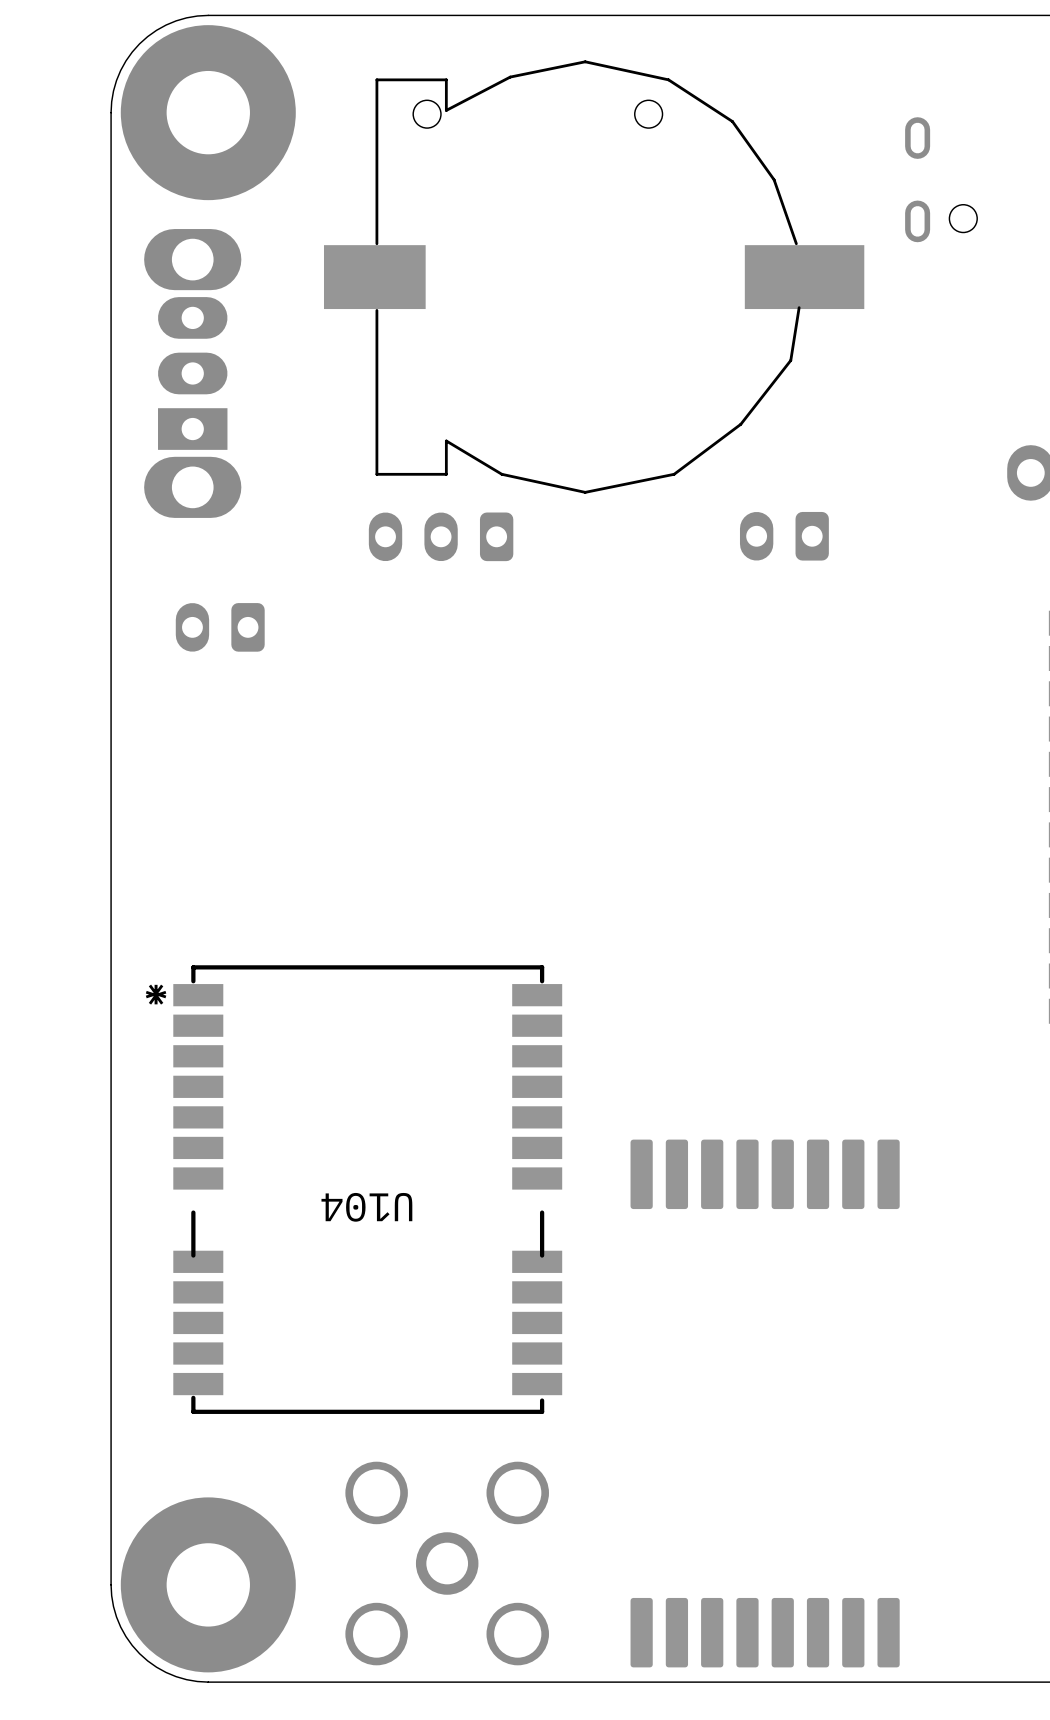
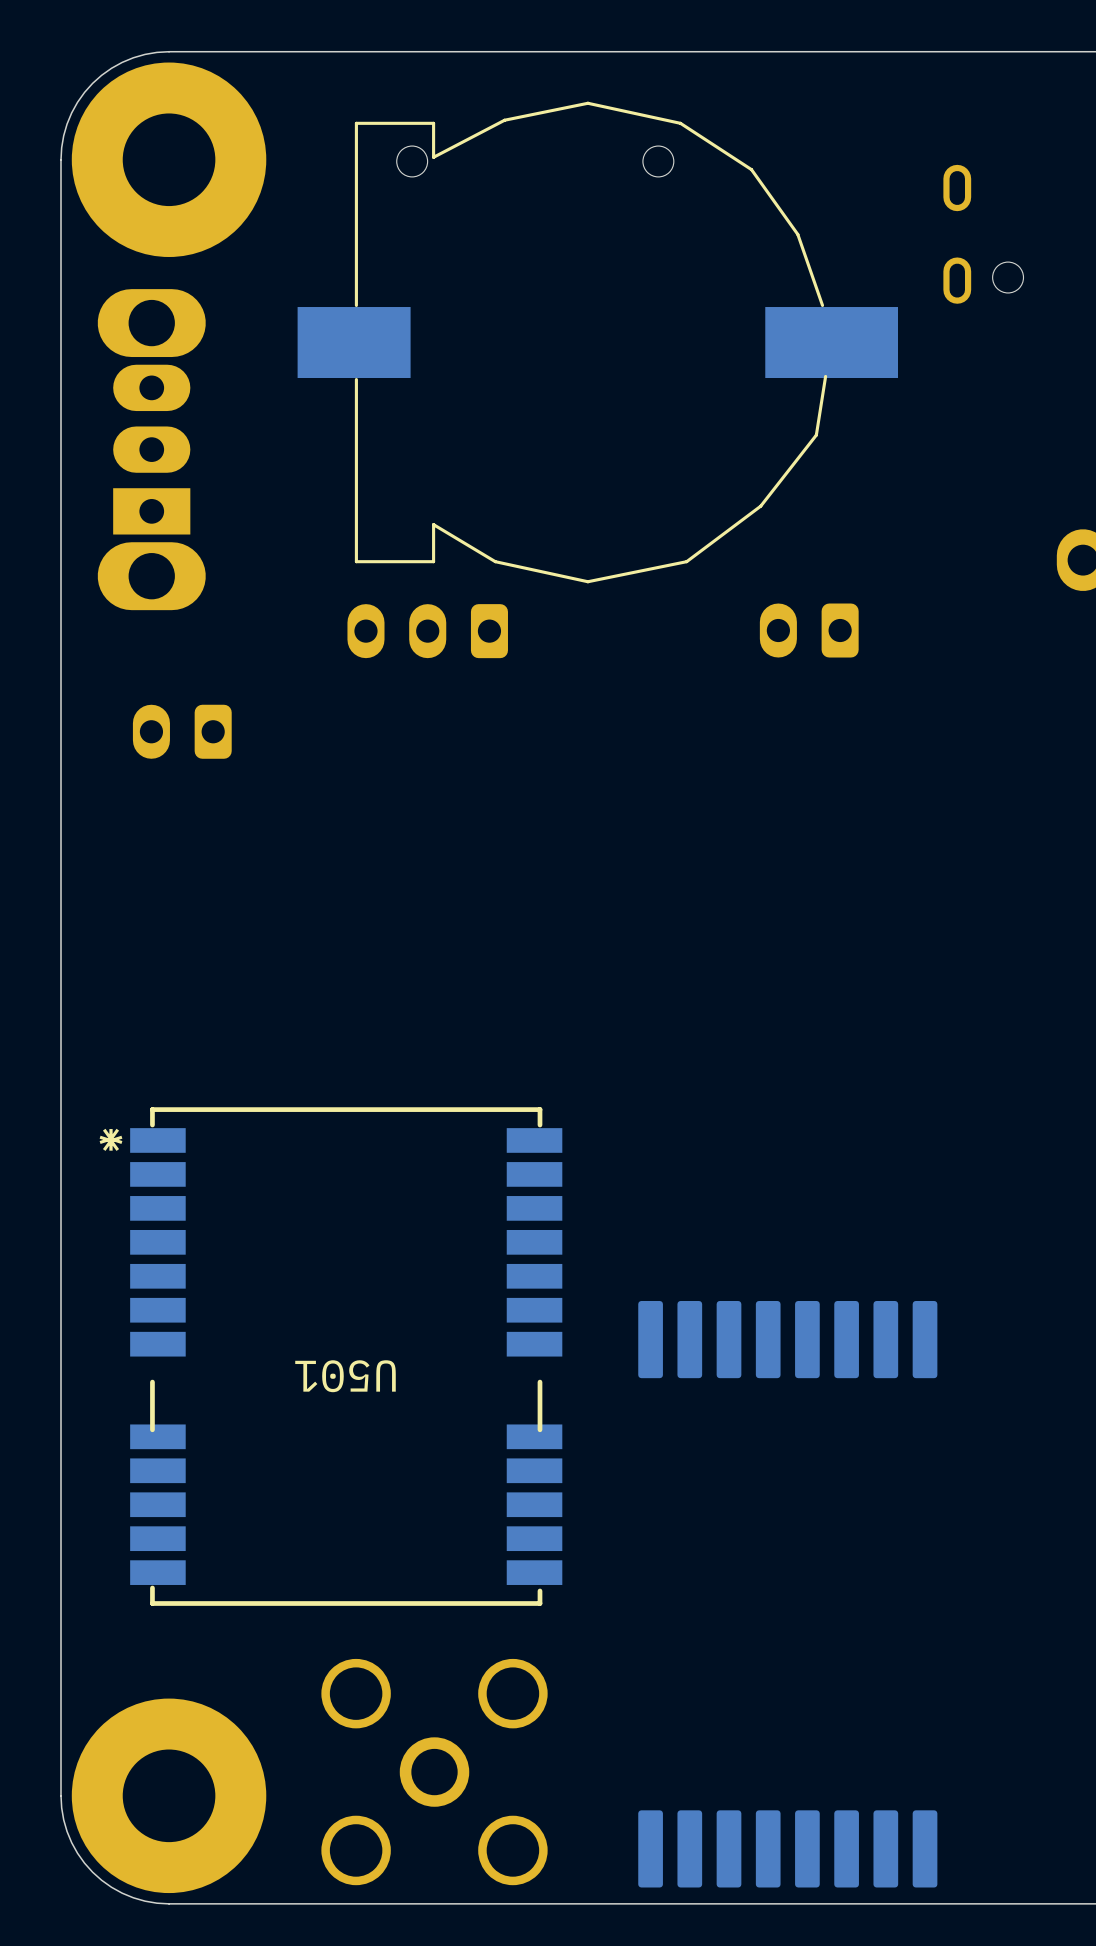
U104 name: U104 (366, 1207) -> U501 (345, 1376)

